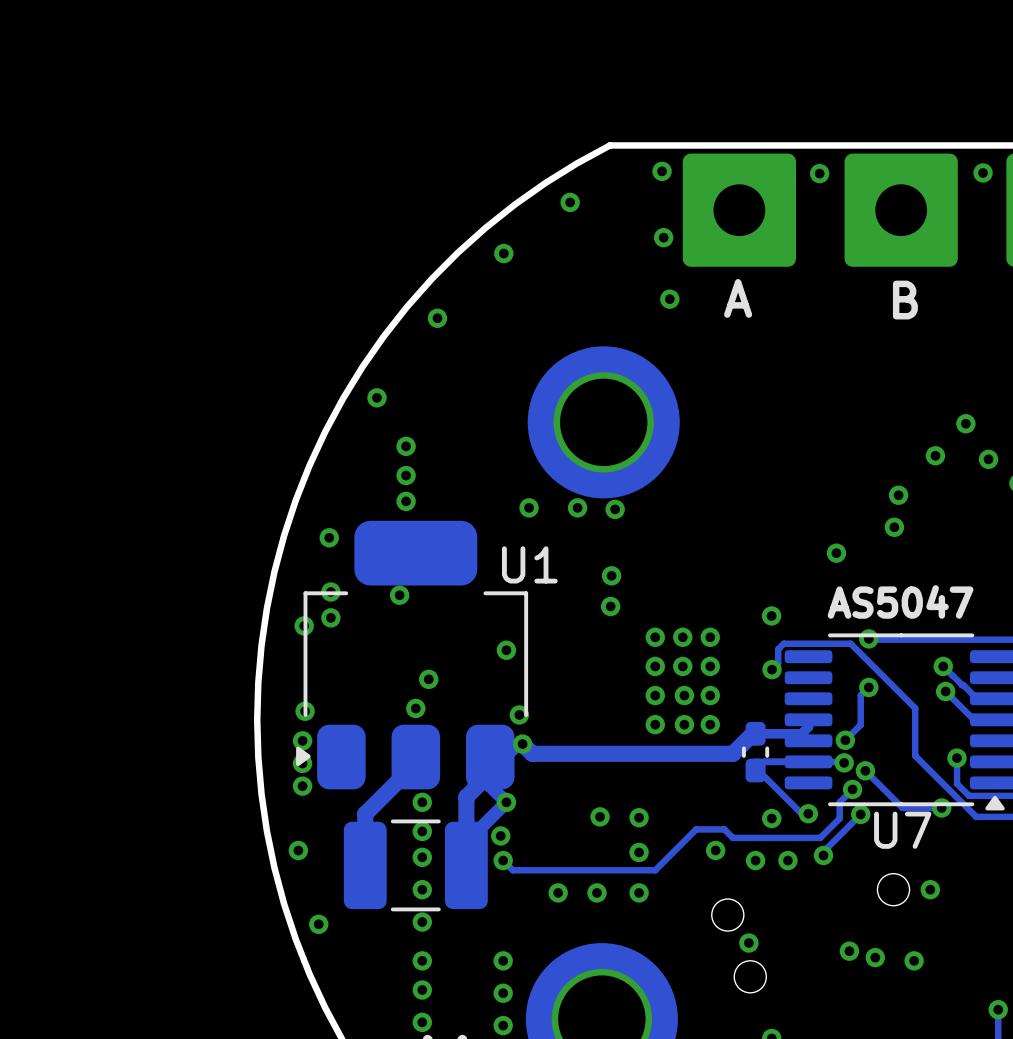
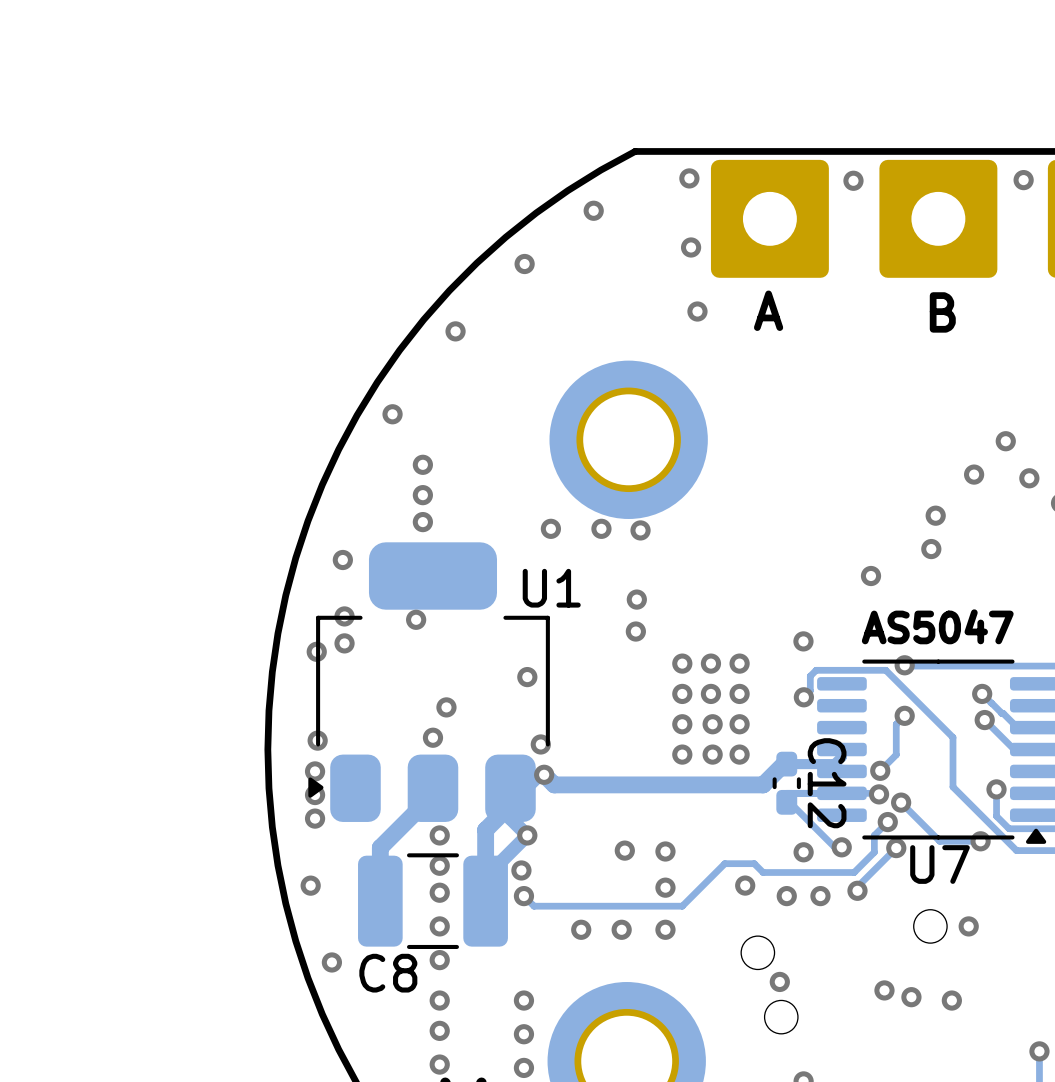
C12 name: none -> C12 (827, 783)
C8 name: none -> C8 (388, 973)

